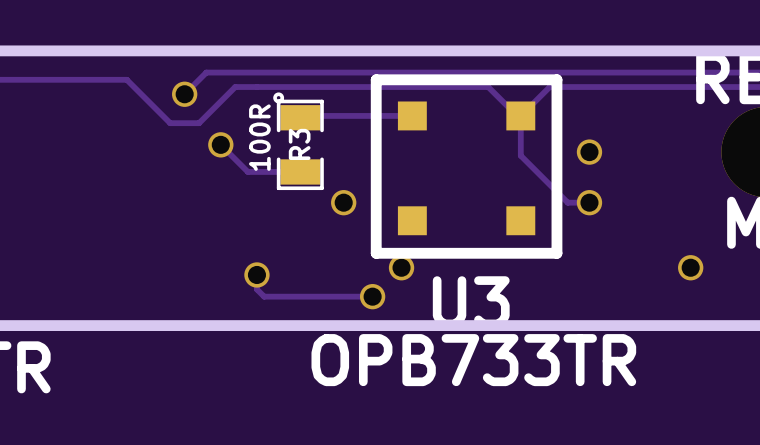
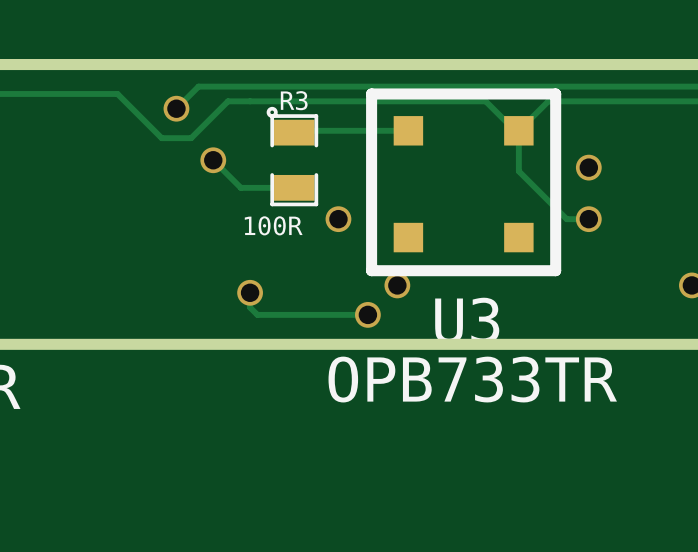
R3 value rotation: 0° (259, 137) -> 90° clockwise (273, 225)
R3 name rotation: 0° (299, 144) -> 90° clockwise (294, 100)
R3 name position: R3 (299, 144) -> R3 (294, 100)

